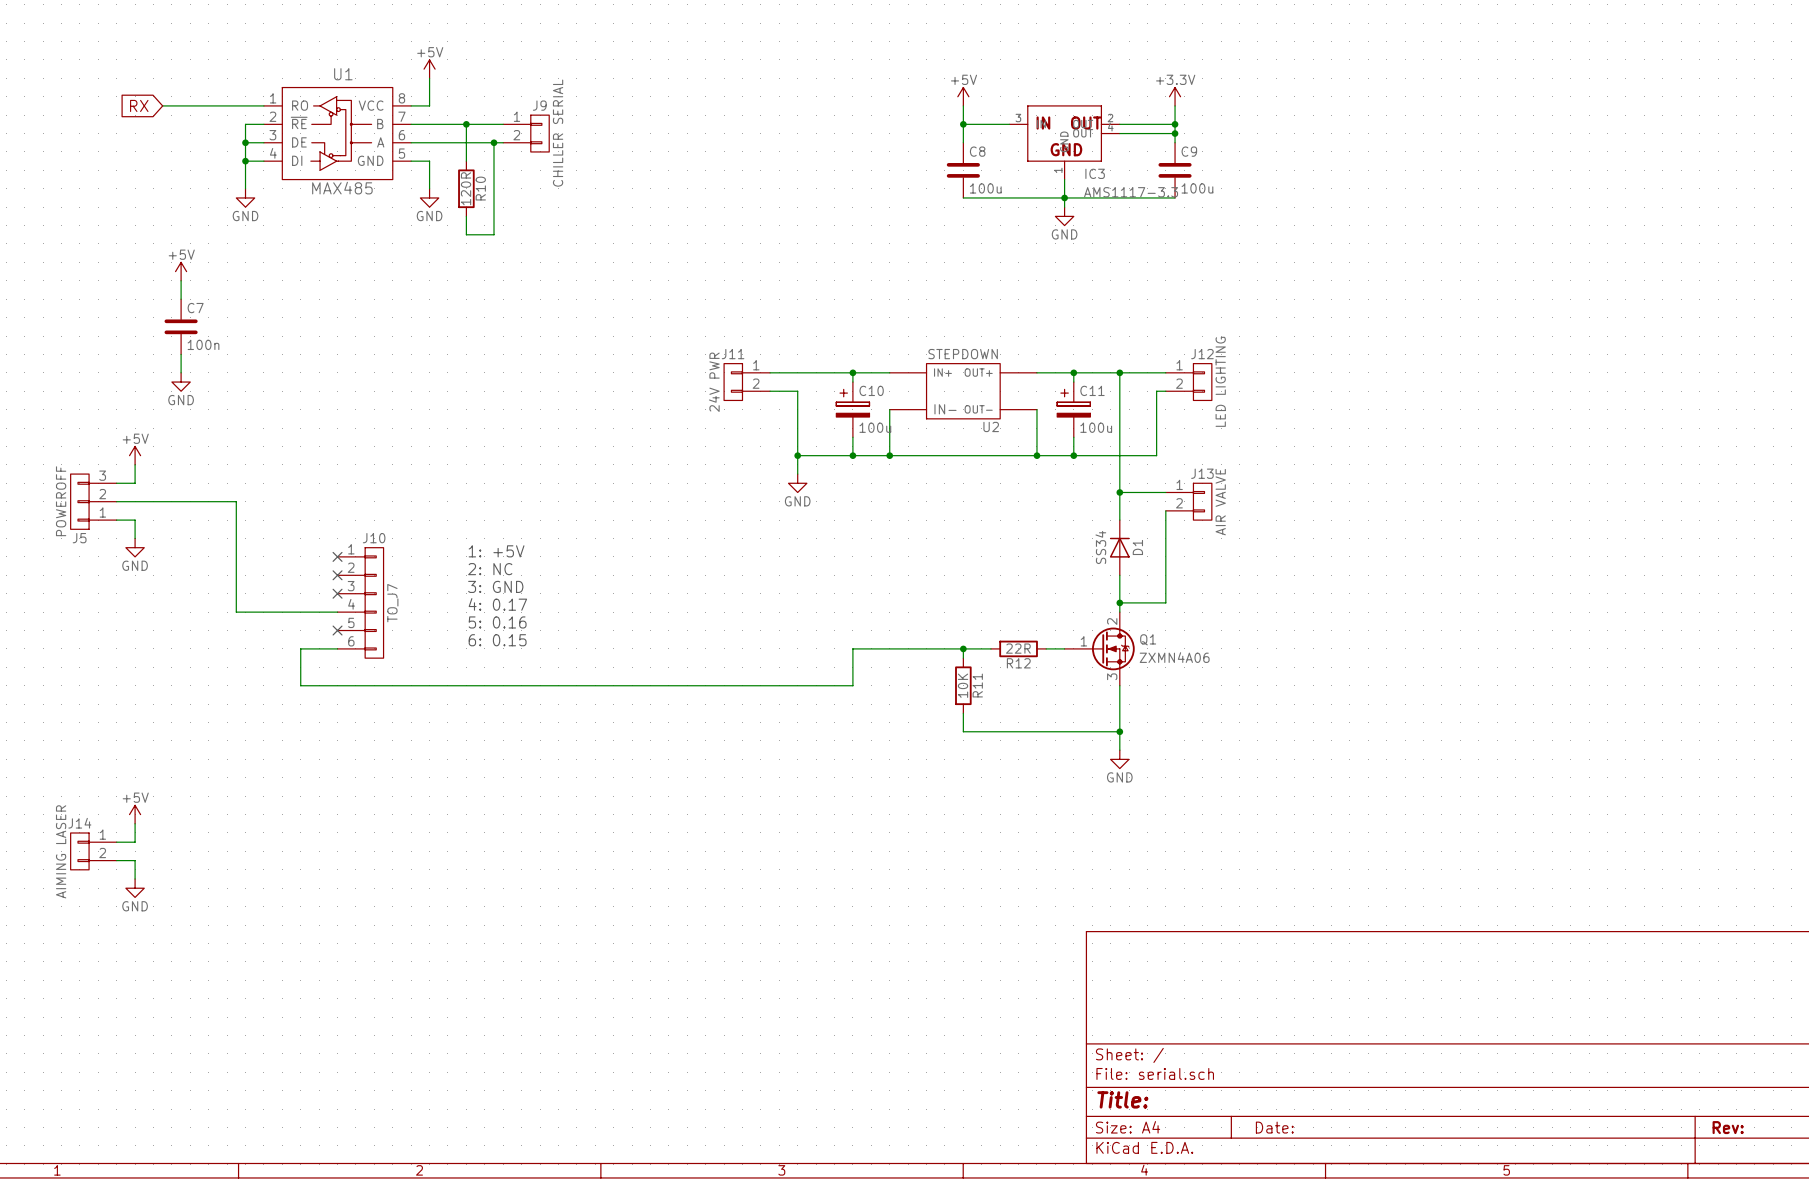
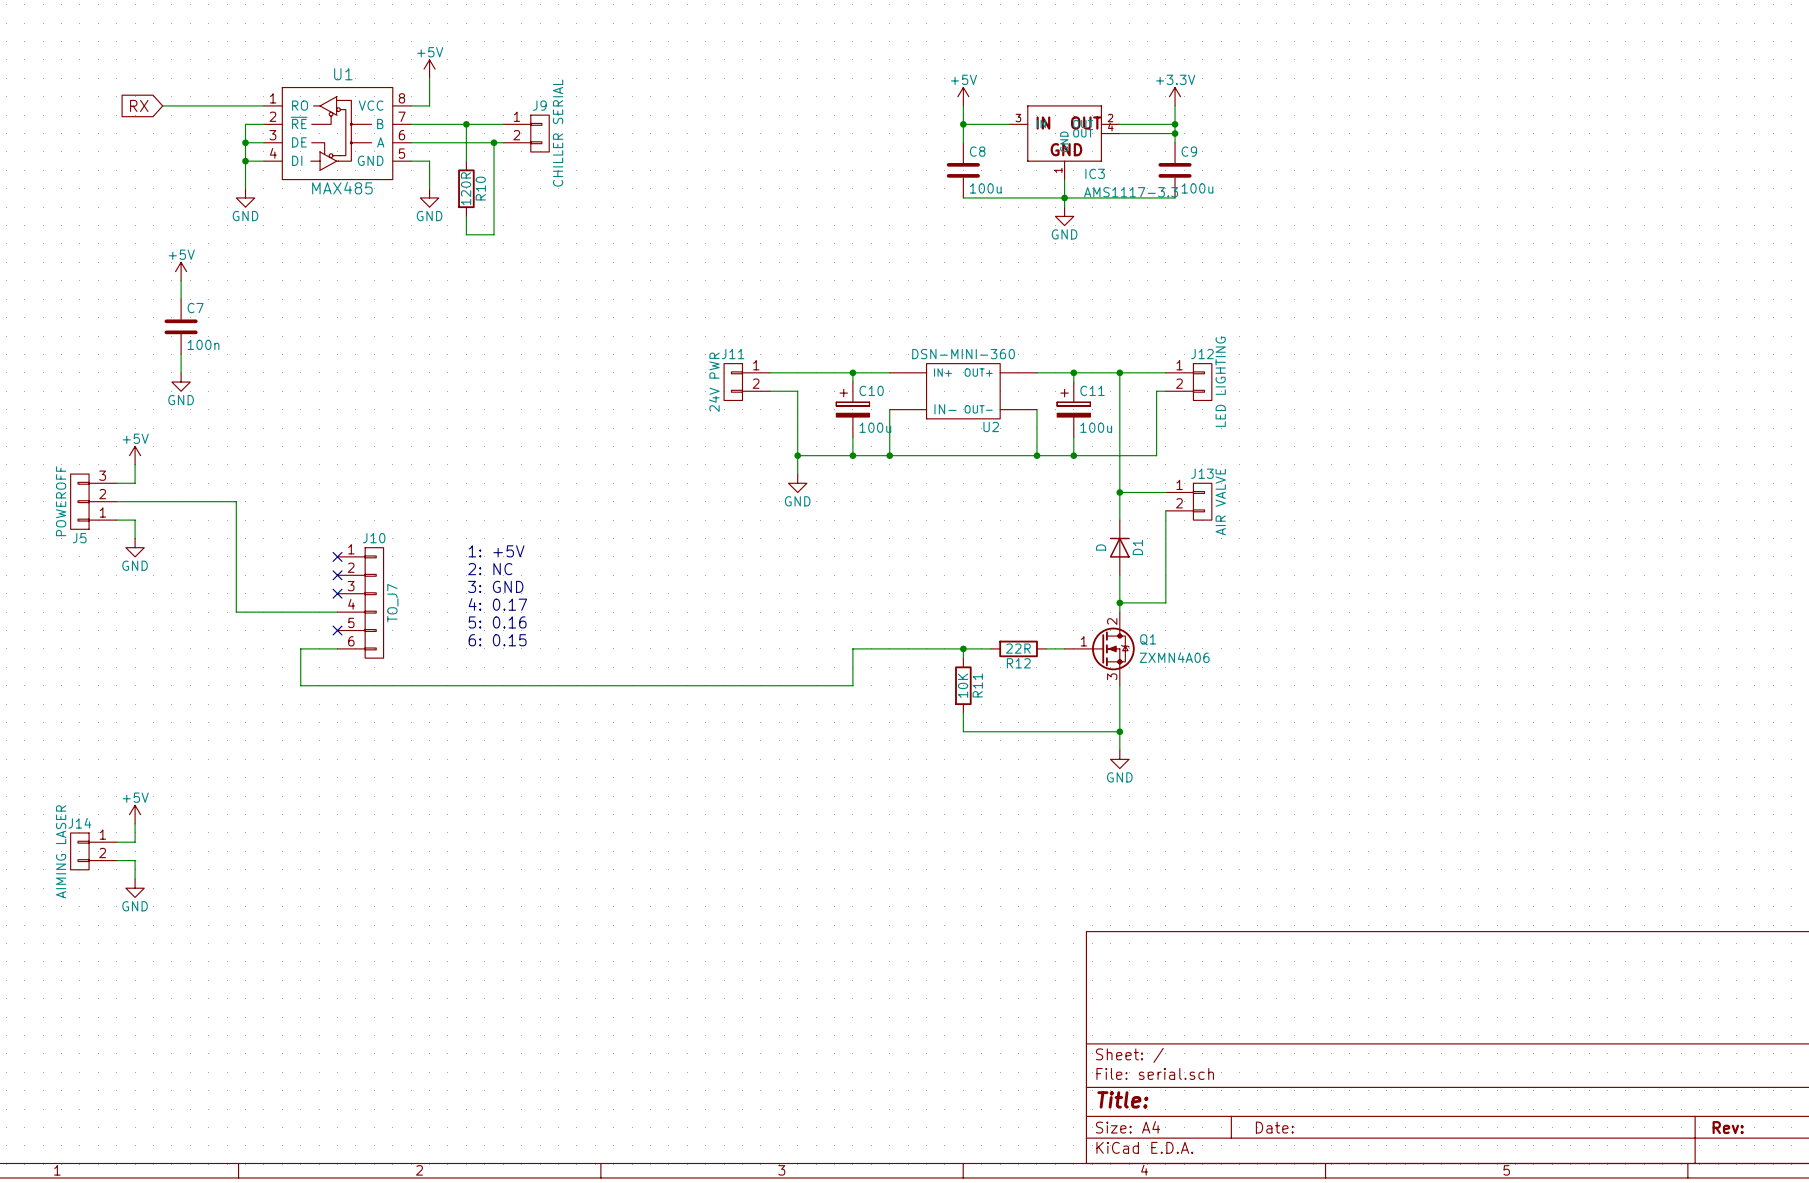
U2 value: STEPDOWN (963, 354) -> DSN-MINI-360 (963, 354)
D1 value: SS34 (1100, 547) -> D (1101, 547)

